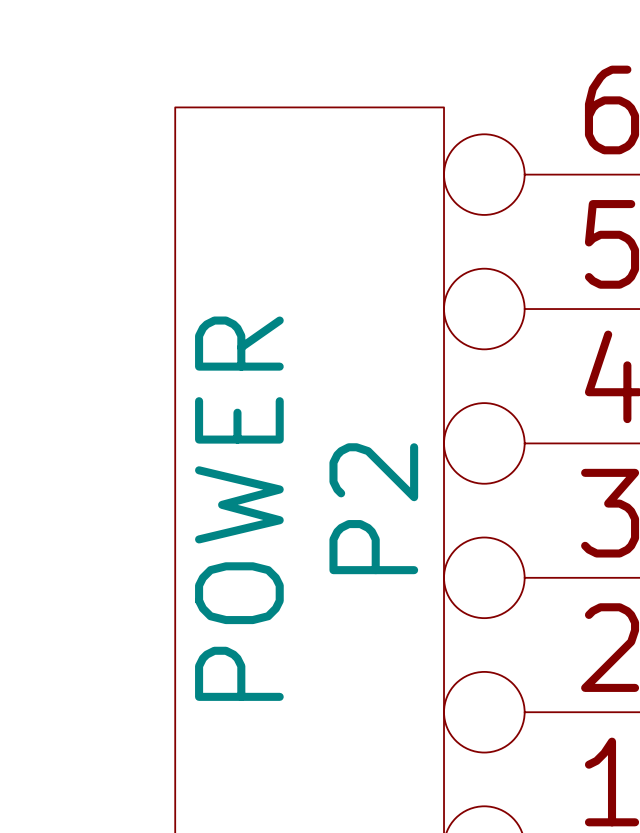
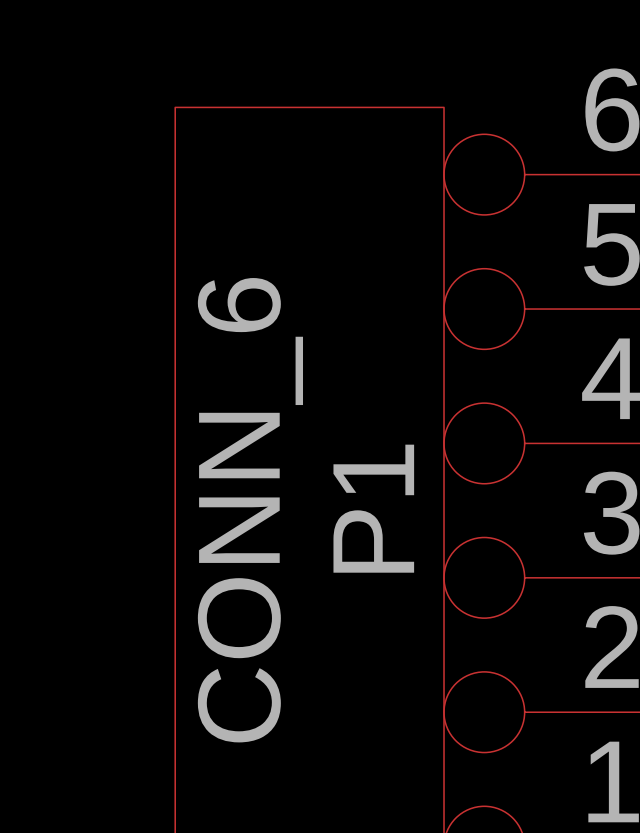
P2 value: POWER (239, 508) -> CONN_6 (250, 510)
P2 name: P2 (373, 508) -> P1 (373, 508)

